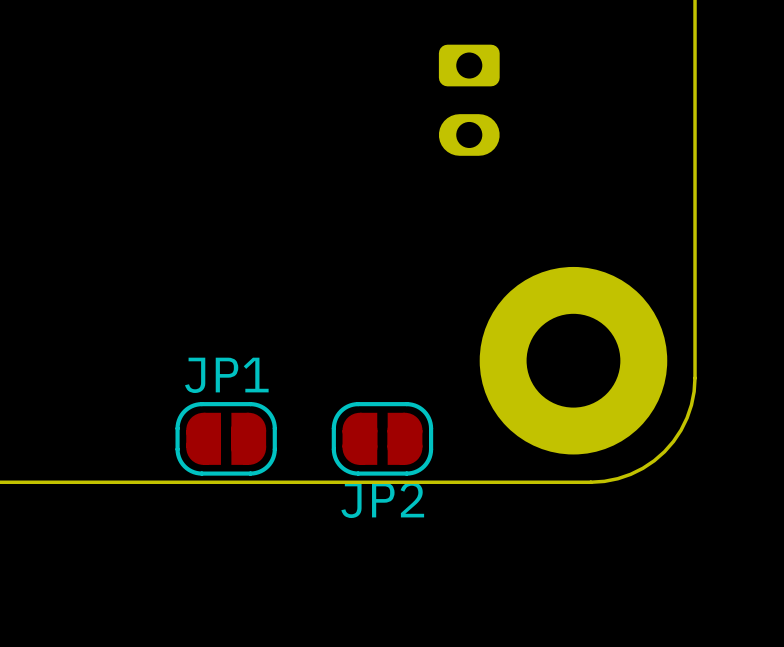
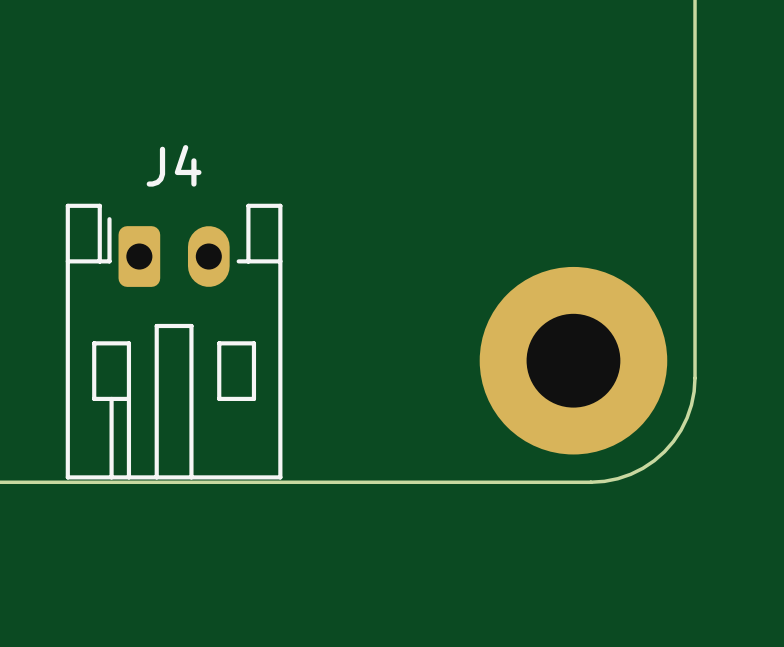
part: (469, 100) -> none
J4: none -> (174, 341)
JP1: (226, 438) -> none
JP2: (382, 438) -> none

